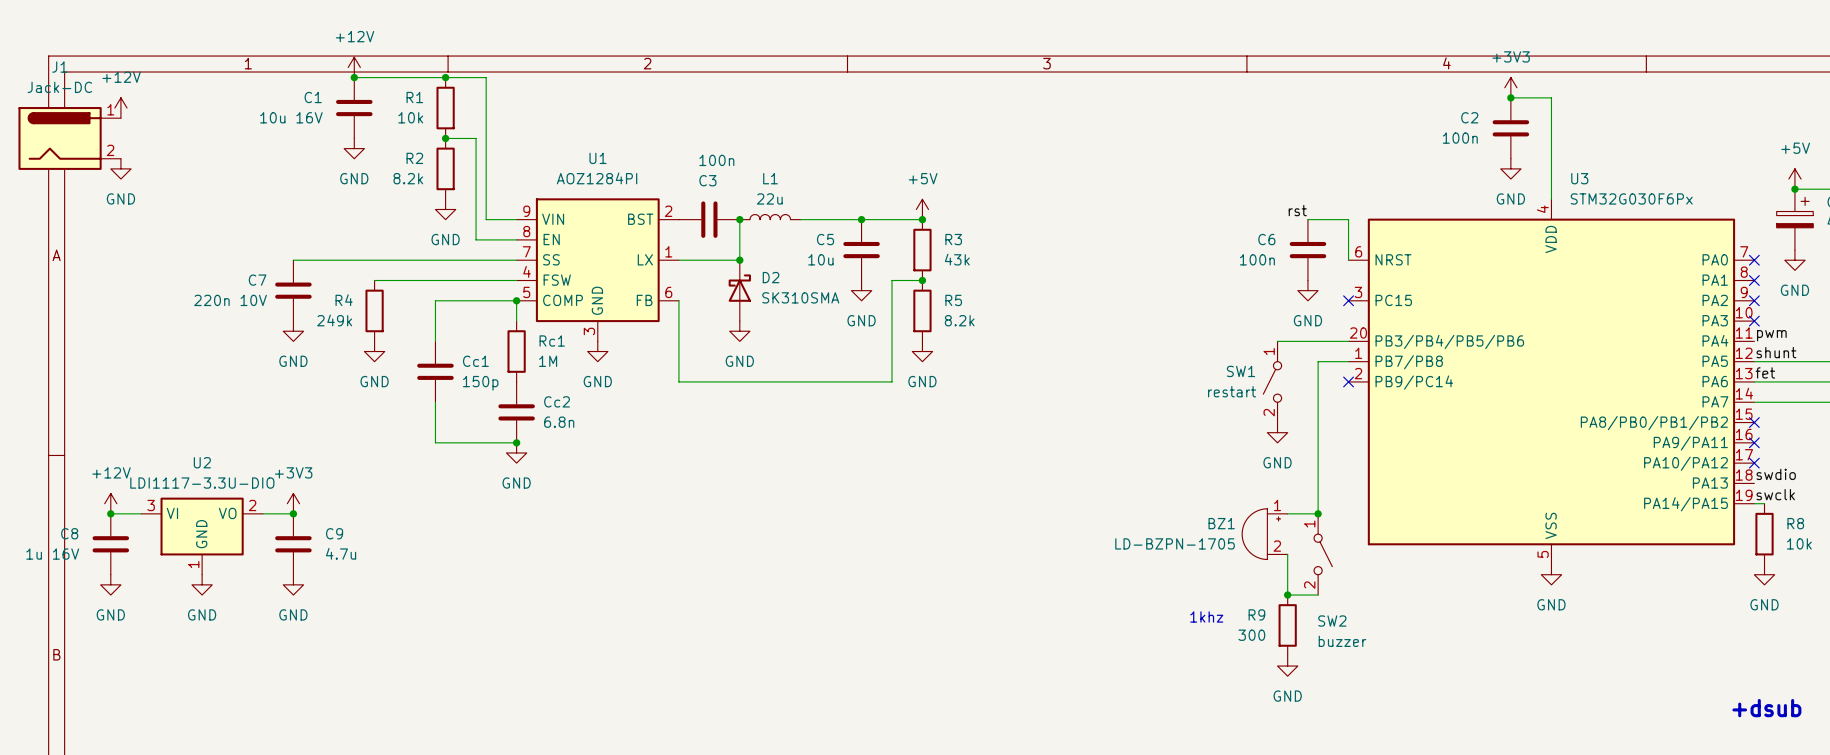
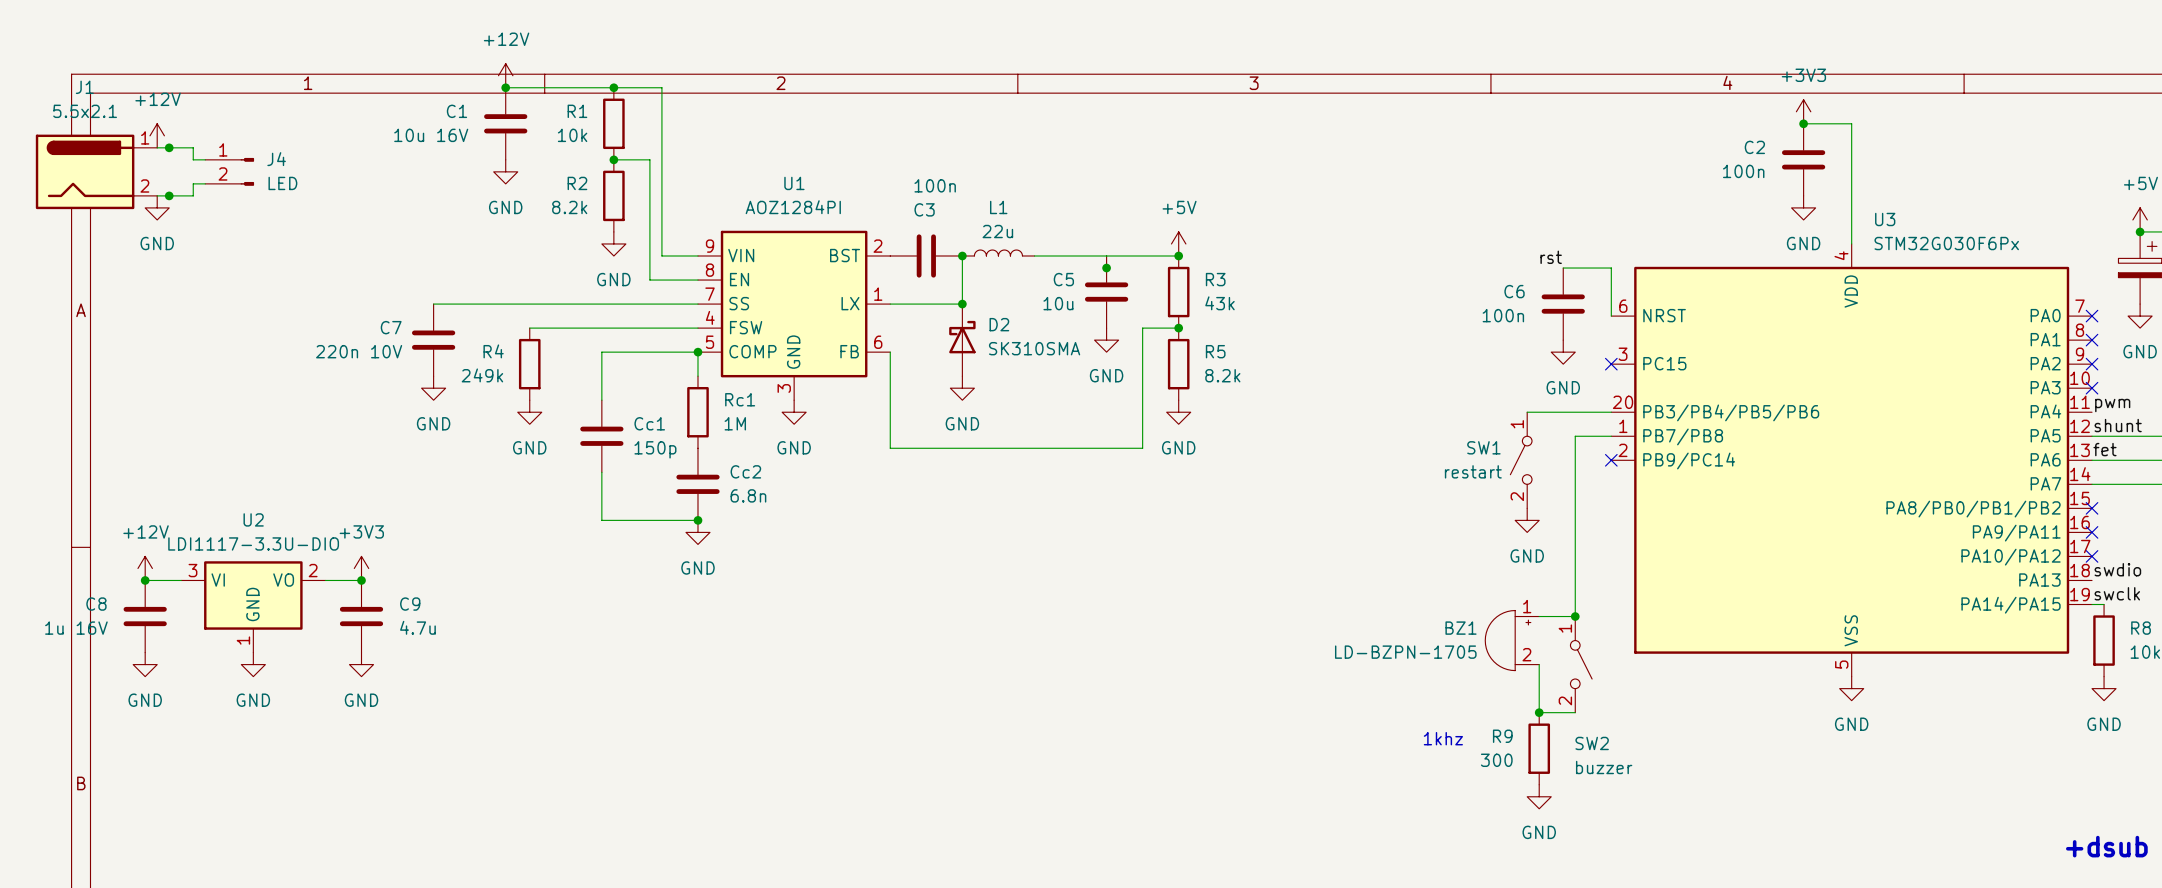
power symbol position: +12V (354, 67) -> +12V (505, 75)
junction: none -> (505, 87)
junction: none -> (613, 87)
wire: (354, 77) (486, 77) (486, 219) (516, 219) -> (505, 87) (661, 87) (661, 256) (697, 256)
junction: (354, 77) -> none
junction: (445, 77) -> none
J1 value: Jack-DC (59, 87) -> 5.5x2.1 (85, 111)
C1 position: (354, 108) -> (505, 123)
R1 position: (445, 108) -> (613, 123)
wire: none -> (157, 147) (193, 147) (193, 159) (205, 159)
junction: none -> (169, 147)
junction: none -> (613, 159)
J4: none -> LED (229, 171)
power symbol: none -> GND (505, 171)
wire: (445, 138) (476, 138) (476, 239) (516, 239) -> (613, 159) (649, 159) (649, 280) (697, 280)
junction: (445, 138) -> none
wire: none -> (205, 183) (193, 183) (193, 195) (157, 195)
power symbol: GND (354, 148) -> none
junction: none -> (169, 195)
R2 position: (445, 168) -> (613, 195)
power symbol: none -> GND (613, 243)
power symbol: GND (445, 209) -> none
junction: none -> (962, 256)
power symbol position: +5V (922, 209) -> +5V (1178, 243)
junction: none -> (1178, 256)
L1 position: (770, 217) -> (998, 253)
C3 position: (709, 219) -> (926, 256)
wire: (739, 219) (739, 260) (678, 260) -> (962, 256) (962, 304) (890, 304)
junction: (739, 219) -> none
wire: (800, 219) (922, 219) -> (1034, 256) (1178, 256)
junction: (861, 219) -> none
junction: none -> (962, 304)
C5 position: (861, 250) -> (1106, 292)
R3 position: (922, 250) -> (1178, 292)
wire: (293, 260) (516, 260) -> (433, 304) (697, 304)
junction: (739, 260) -> none
U1 position: (597, 269) -> (794, 315)
junction: none -> (1178, 328)
wire: (374, 280) (516, 280) -> (529, 328) (697, 328)
wire: (922, 280) (892, 280) (892, 381) (678, 381) (678, 300) -> (1178, 328) (1142, 328) (1142, 448) (890, 448) (890, 352)
junction: (922, 280) -> none
power symbol: none -> GND (1106, 340)
C7 position: (293, 290) -> (433, 340)
junction: none -> (697, 352)
D2 position: (739, 290) -> (962, 340)
power symbol: GND (861, 290) -> none
junction: (516, 300) -> none
R4 position: (374, 310) -> (529, 364)
R5 position: (922, 310) -> (1178, 364)
power symbol: none -> GND (433, 388)
wire: (516, 321) (516, 300) (435, 300) (435, 341) -> (697, 376) (697, 352) (601, 352) (601, 400)
power symbol: none -> GND (962, 388)
power symbol: GND (293, 331) -> none
power symbol: GND (739, 331) -> none
power symbol: none -> GND (529, 412)
power symbol: none -> GND (794, 412)
power symbol: none -> GND (1178, 412)
power symbol: GND (374, 351) -> none
Rc1 position: (516, 351) -> (697, 412)
power symbol: GND (597, 351) -> none
power symbol: GND (922, 351) -> none
Cc1 position: (435, 371) -> (601, 436)
wire: (435, 402) (435, 442) (516, 442) -> (601, 472) (601, 520) (697, 520)
Cc2 position: (516, 412) -> (697, 484)
junction: none -> (697, 520)
junction: (516, 442) -> none
power symbol: none -> GND (697, 532)
power symbol: GND (516, 452) -> none
power symbol position: +12V (110, 503) -> +12V (145, 568)
power symbol position: +3V3 (293, 503) -> +3V3 (361, 568)
wire: (110, 513) (141, 513) -> (145, 580) (181, 580)
junction position: (110, 513) -> (145, 580)
wire: (262, 513) (293, 513) -> (325, 580) (361, 580)
junction position: (293, 513) -> (361, 580)
U2 position: (202, 536) -> (253, 606)
C8 position: (110, 544) -> (145, 616)
C9 position: (293, 544) -> (361, 616)
power symbol position: GND (110, 584) -> GND (145, 664)
power symbol position: GND (202, 584) -> GND (253, 664)
power symbol position: GND (293, 584) -> GND (361, 664)

